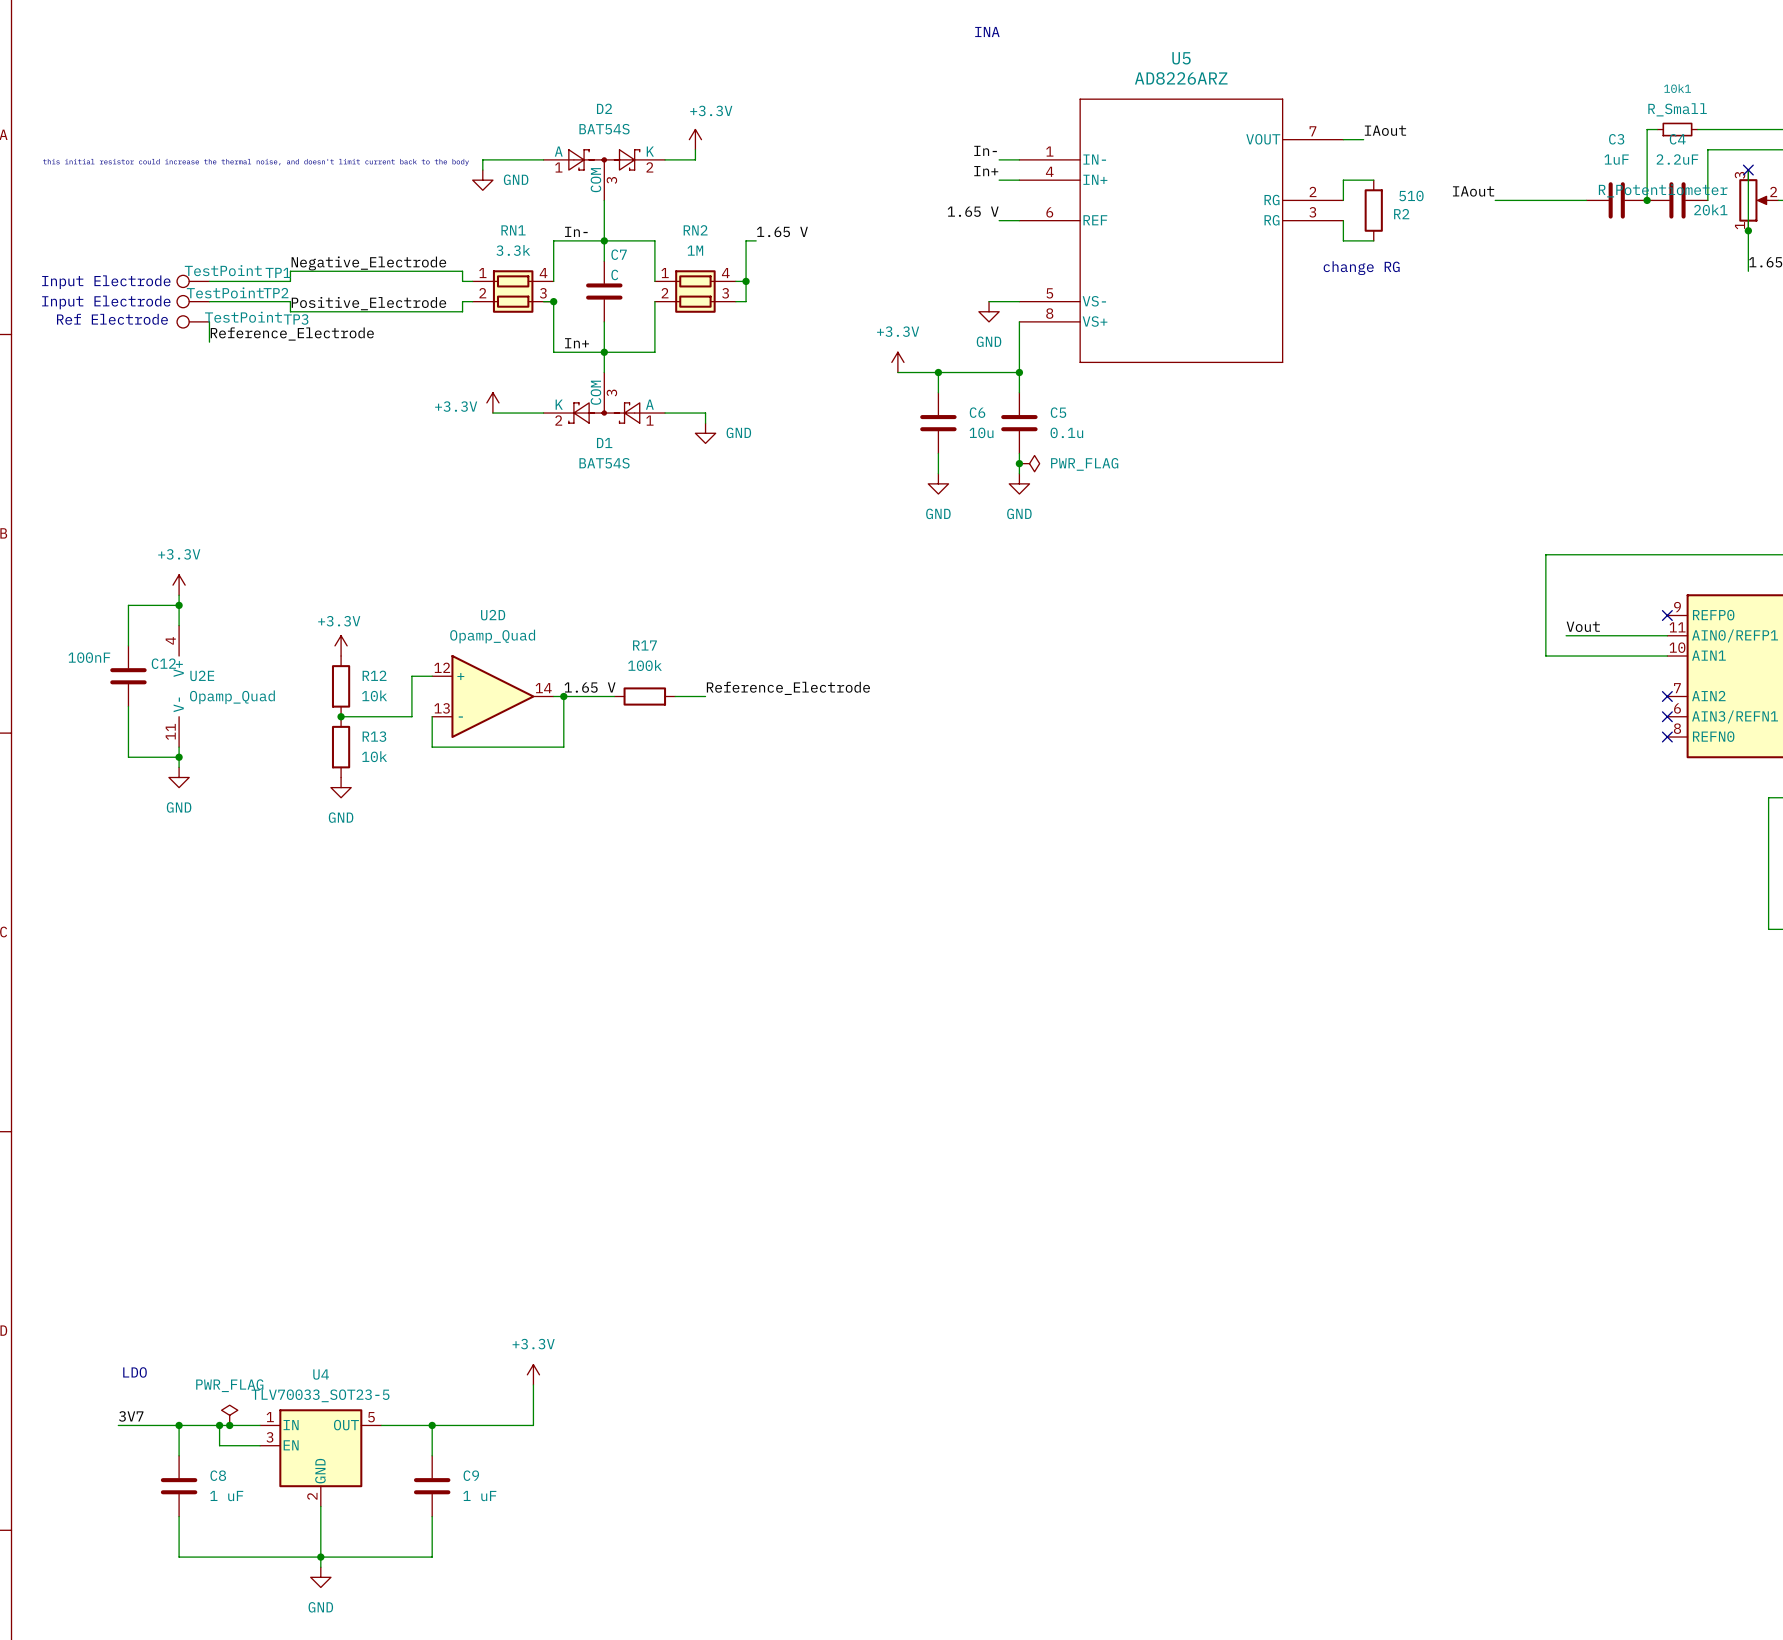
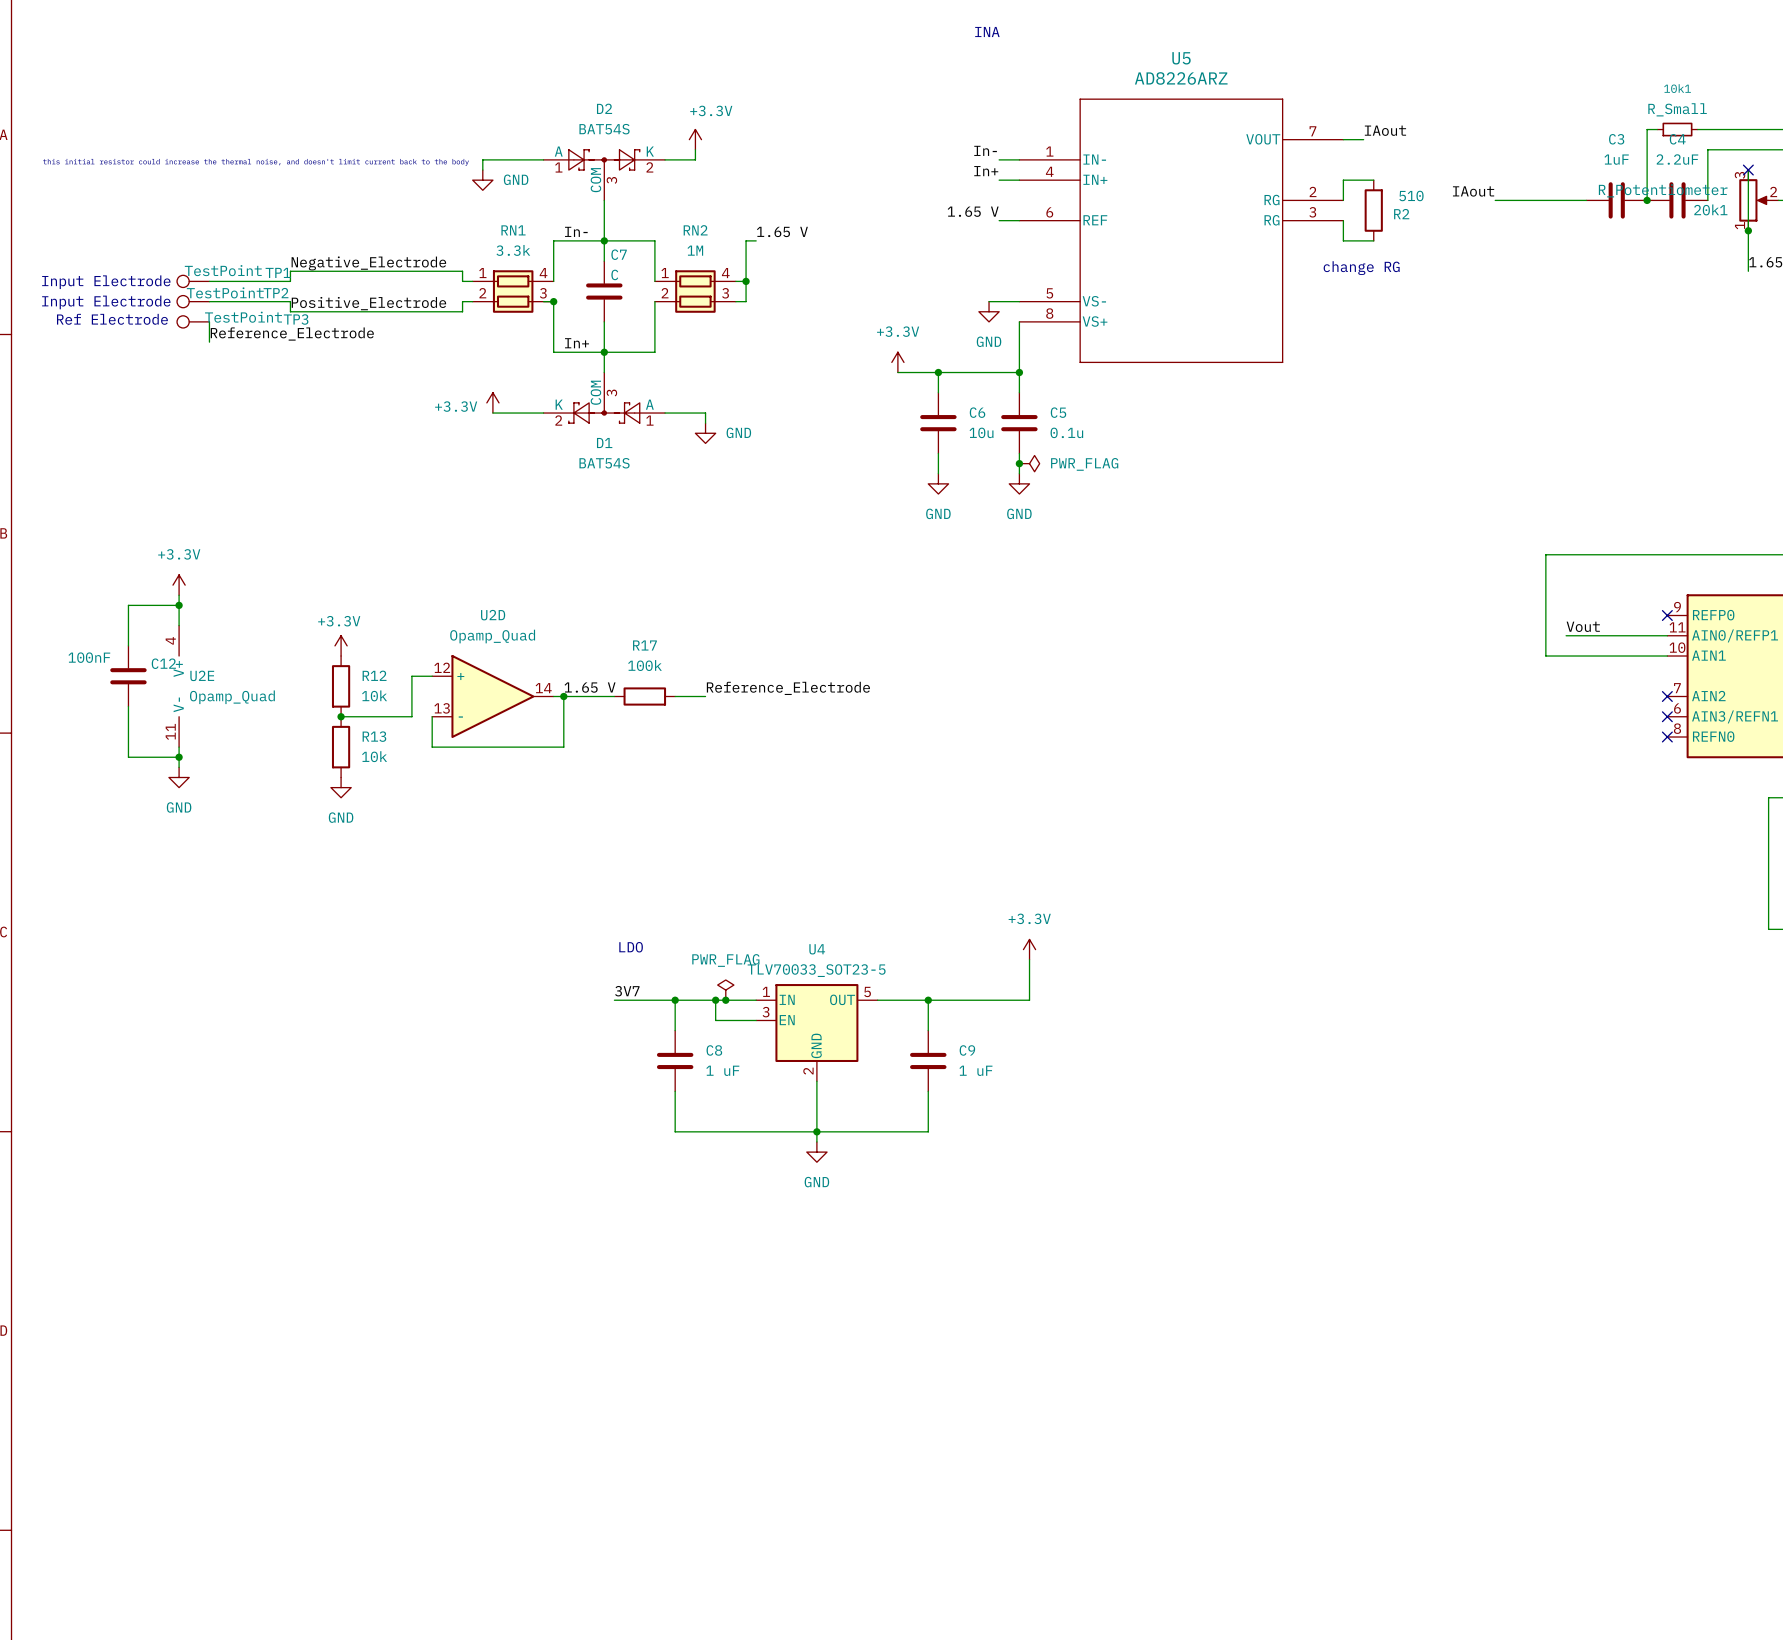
text: none -> LDO (631, 947)
power symbol: none -> +3.3V (1029, 949)
wire: none -> (1029, 959) (1029, 1000) (877, 1000)
power symbol: none -> PWR_FLAG (725, 990)
label: none -> 3V7 (627, 991)
wire: none -> (614, 1000) (756, 1000)
wire: none -> (675, 1000) (675, 1030)
junction: none -> (675, 1000)
wire: none -> (715, 1000) (715, 1020) (756, 1020)
junction: none -> (715, 1000)
junction: none -> (725, 1000)
wire: none -> (928, 1000) (928, 1030)
junction: none -> (928, 1000)
wire: none -> (816, 1081) (816, 1141)
wire: none -> (675, 1091) (675, 1131) (928, 1131) (928, 1091)
junction: none -> (816, 1131)
power symbol: none -> GND (816, 1152)
text: LDO (134, 1372) -> none
power symbol: +3.3V (533, 1374) -> none
wire: (533, 1384) (533, 1425) (381, 1425) -> none
power symbol: PWR_FLAG (229, 1415) -> none
label: 3V7 (131, 1416) -> none
wire: (118, 1425) (260, 1425) -> none
wire: (179, 1425) (179, 1455) -> none
junction: (179, 1425) -> none
wire: (219, 1425) (219, 1445) (260, 1445) -> none
junction: (219, 1425) -> none
junction: (229, 1425) -> none
wire: (432, 1425) (432, 1455) -> none
junction: (432, 1425) -> none
U4 position: (320, 1457) -> (816, 1032)
C8 position: (179, 1486) -> (675, 1060)
C9 position: (432, 1486) -> (928, 1060)
wire: (320, 1506) (320, 1567) -> none
wire: (179, 1516) (179, 1557) (432, 1557) (432, 1516) -> none
junction: (320, 1557) -> none
power symbol: GND (320, 1577) -> none

